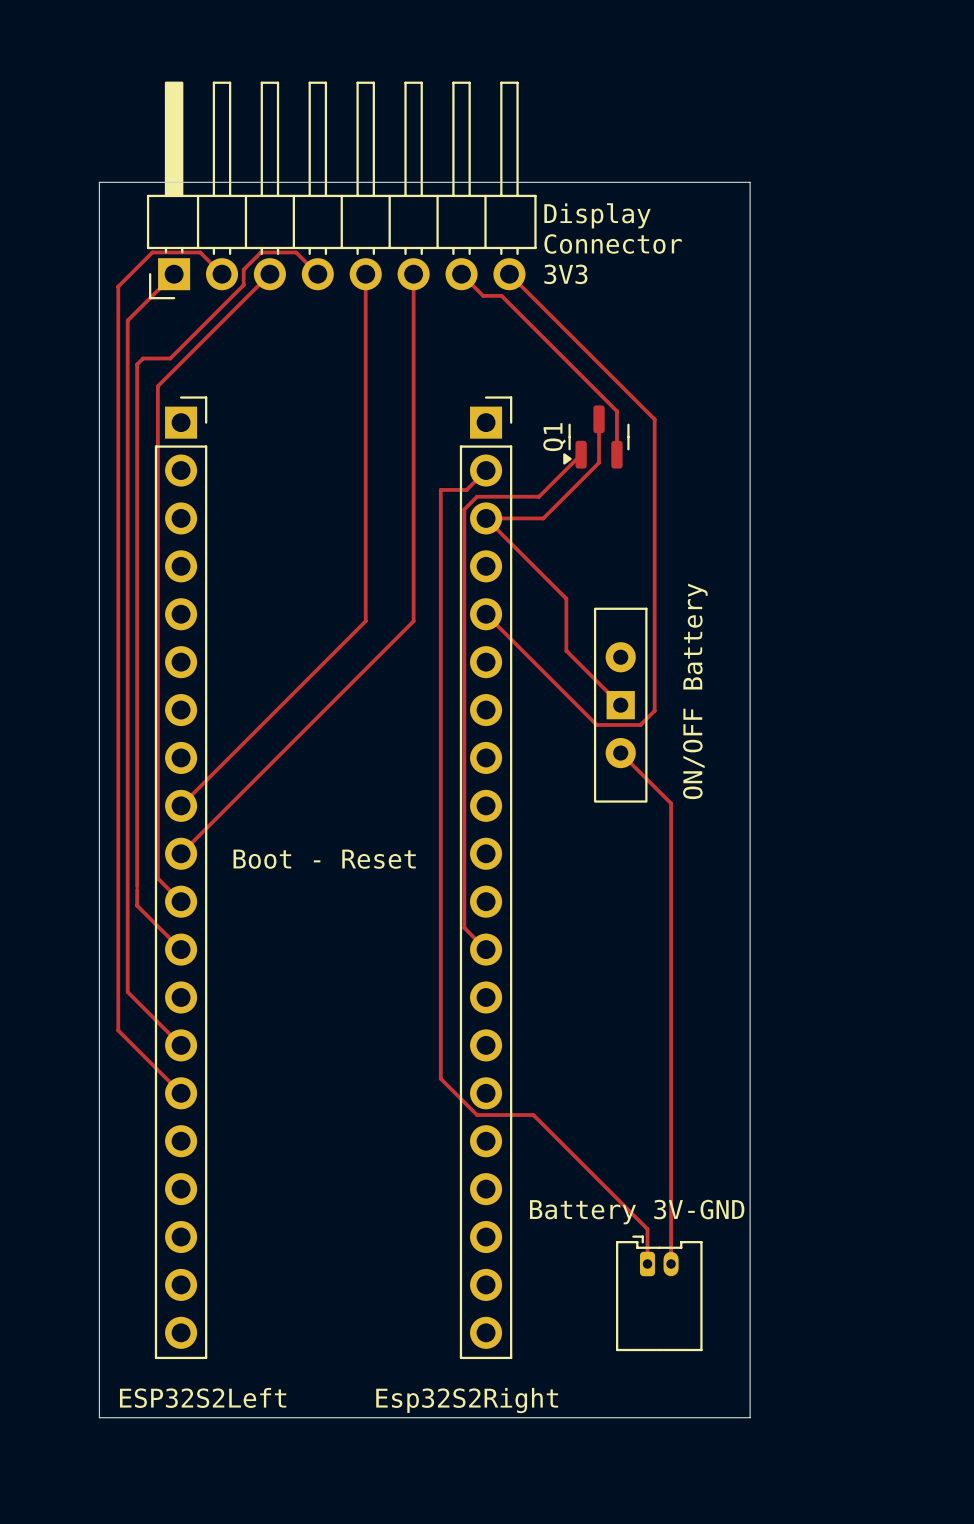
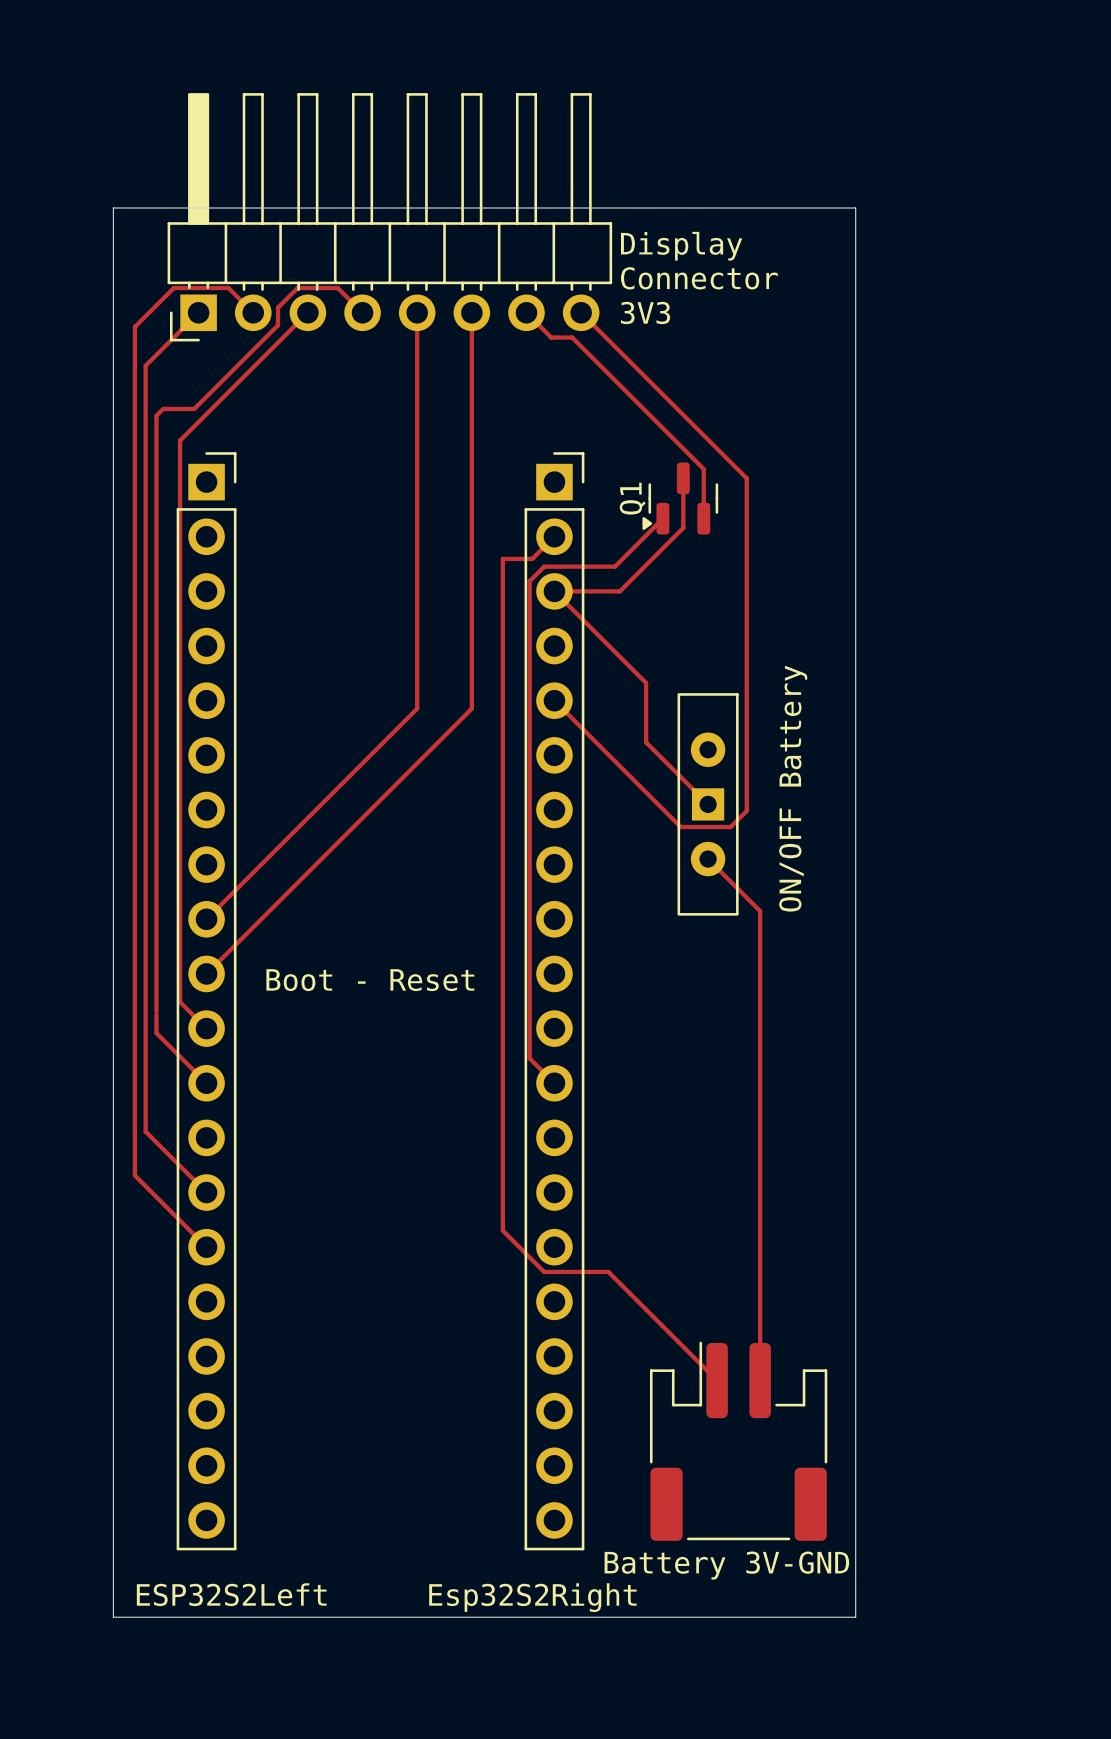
top track: (666, 798) (671, 803) (671, 1264) -> (760, 911) (760, 1380)
top track: (628, 1210) (647, 1229) (647, 1264) -> none
Battery 3V-GND name position: Battery 3V-GND (637, 1212) -> Battery 3V-GND (726, 1565)
Battery 3V-GND footprint: [616, 1235, 703, 1352] -> [649, 1341, 828, 1541]

